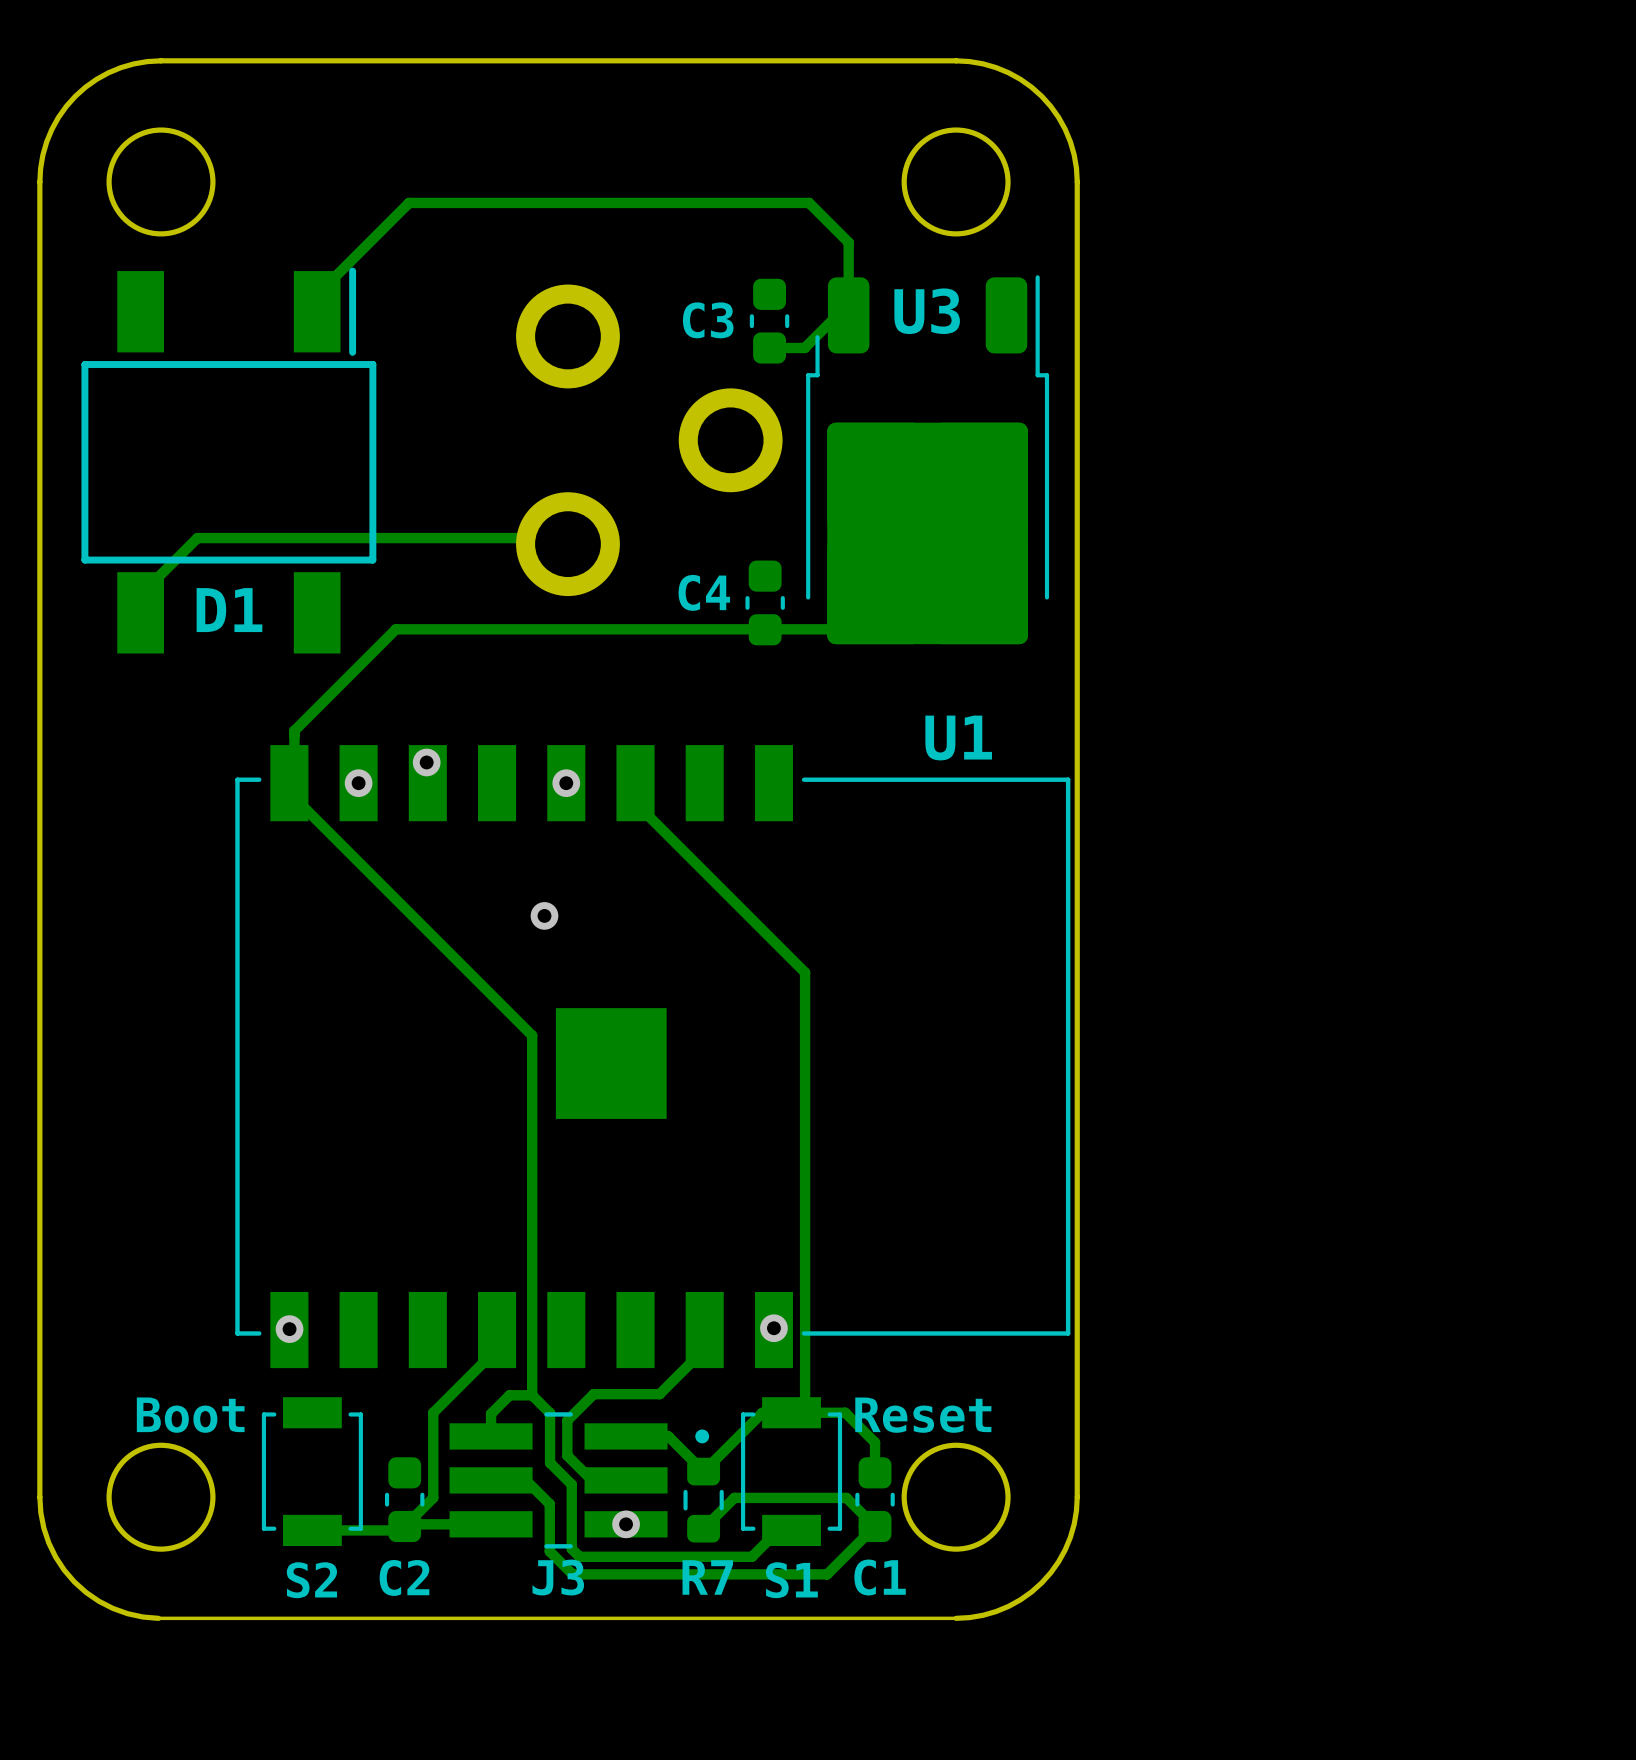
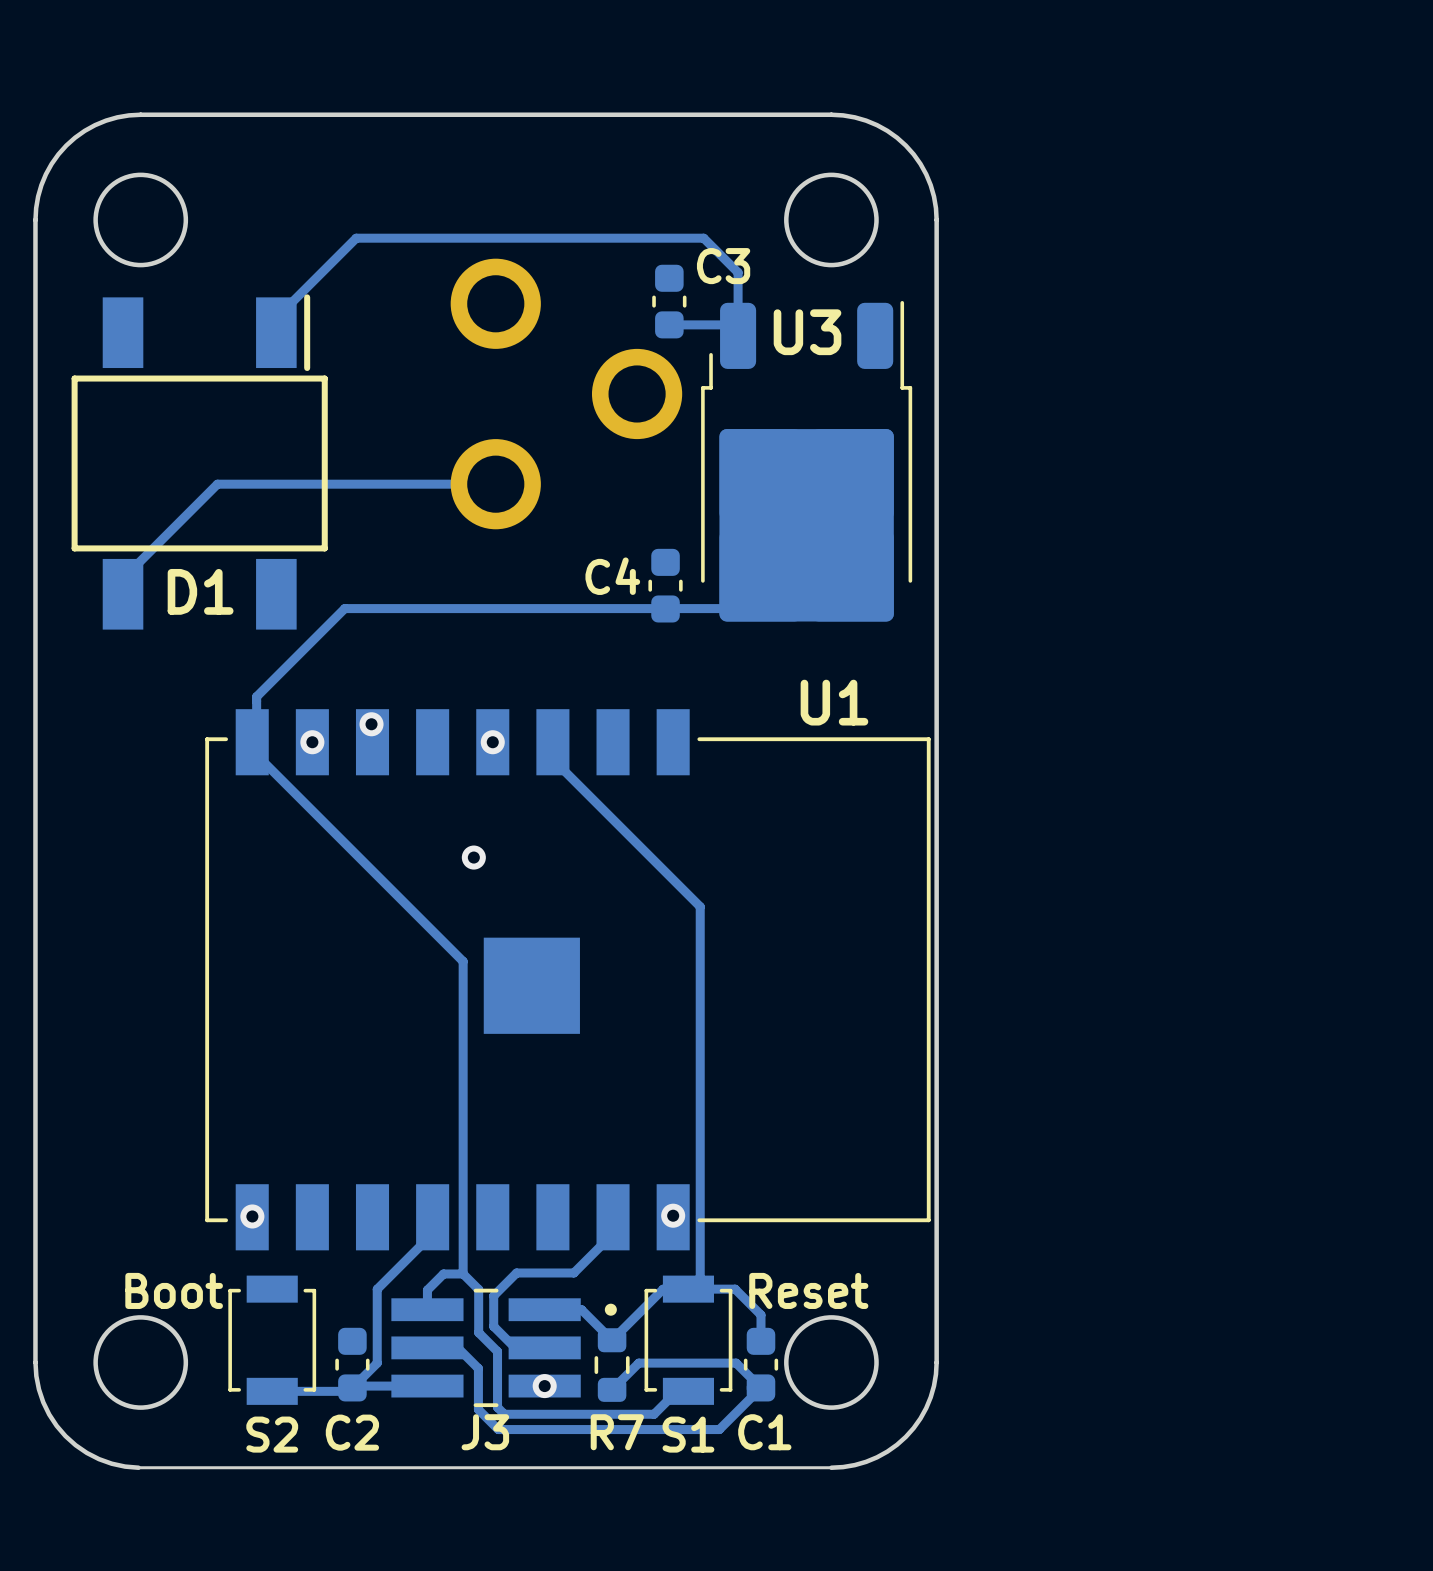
track: (848, 315) (837, 315) (804, 347) (769, 347) -> (738, 335) (727, 324) (669, 324)
C3 name position: C3 (708, 320) -> C3 (723, 266)
C3 position: (769, 321) -> (669, 301)
part position: (649, 440) -> (566, 393)
track: (197, 538) (561, 538) (567, 544) -> (172, 529) (217, 484) (495, 484)

